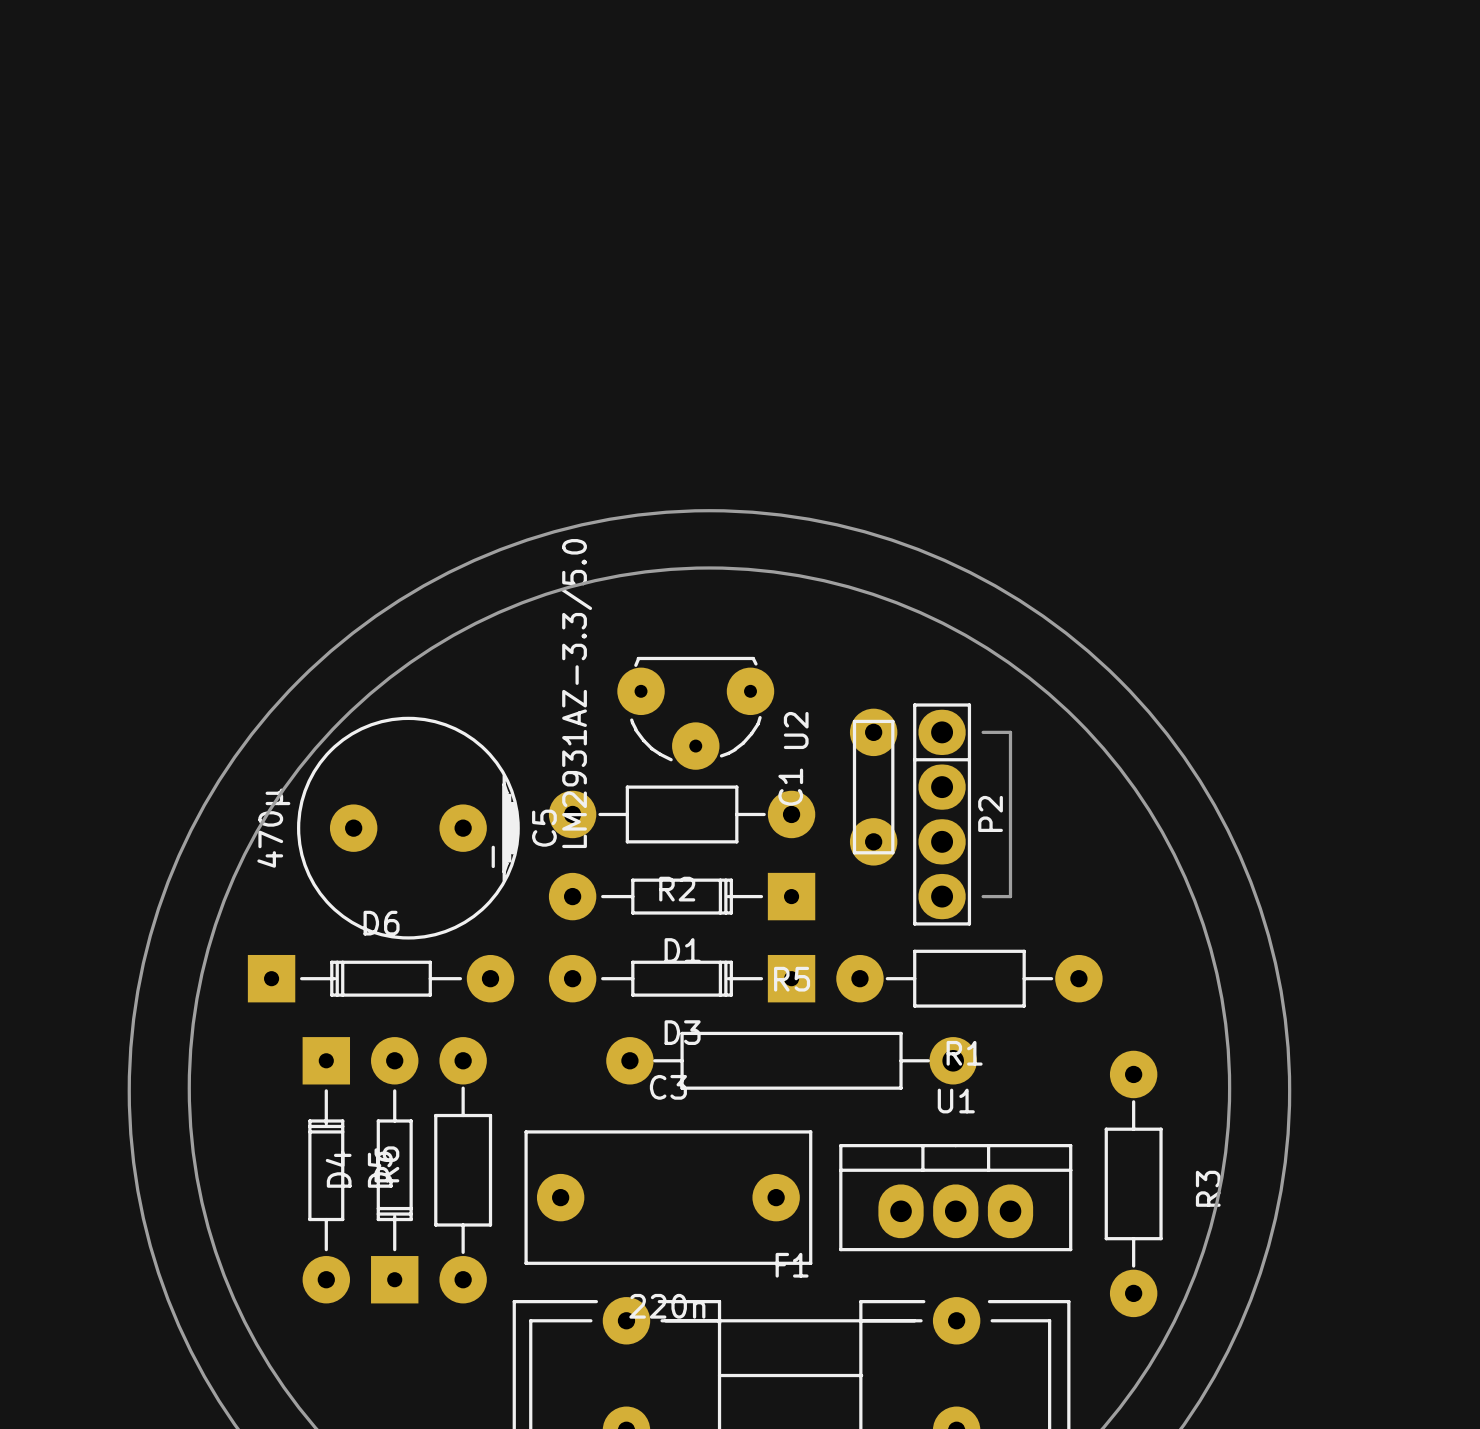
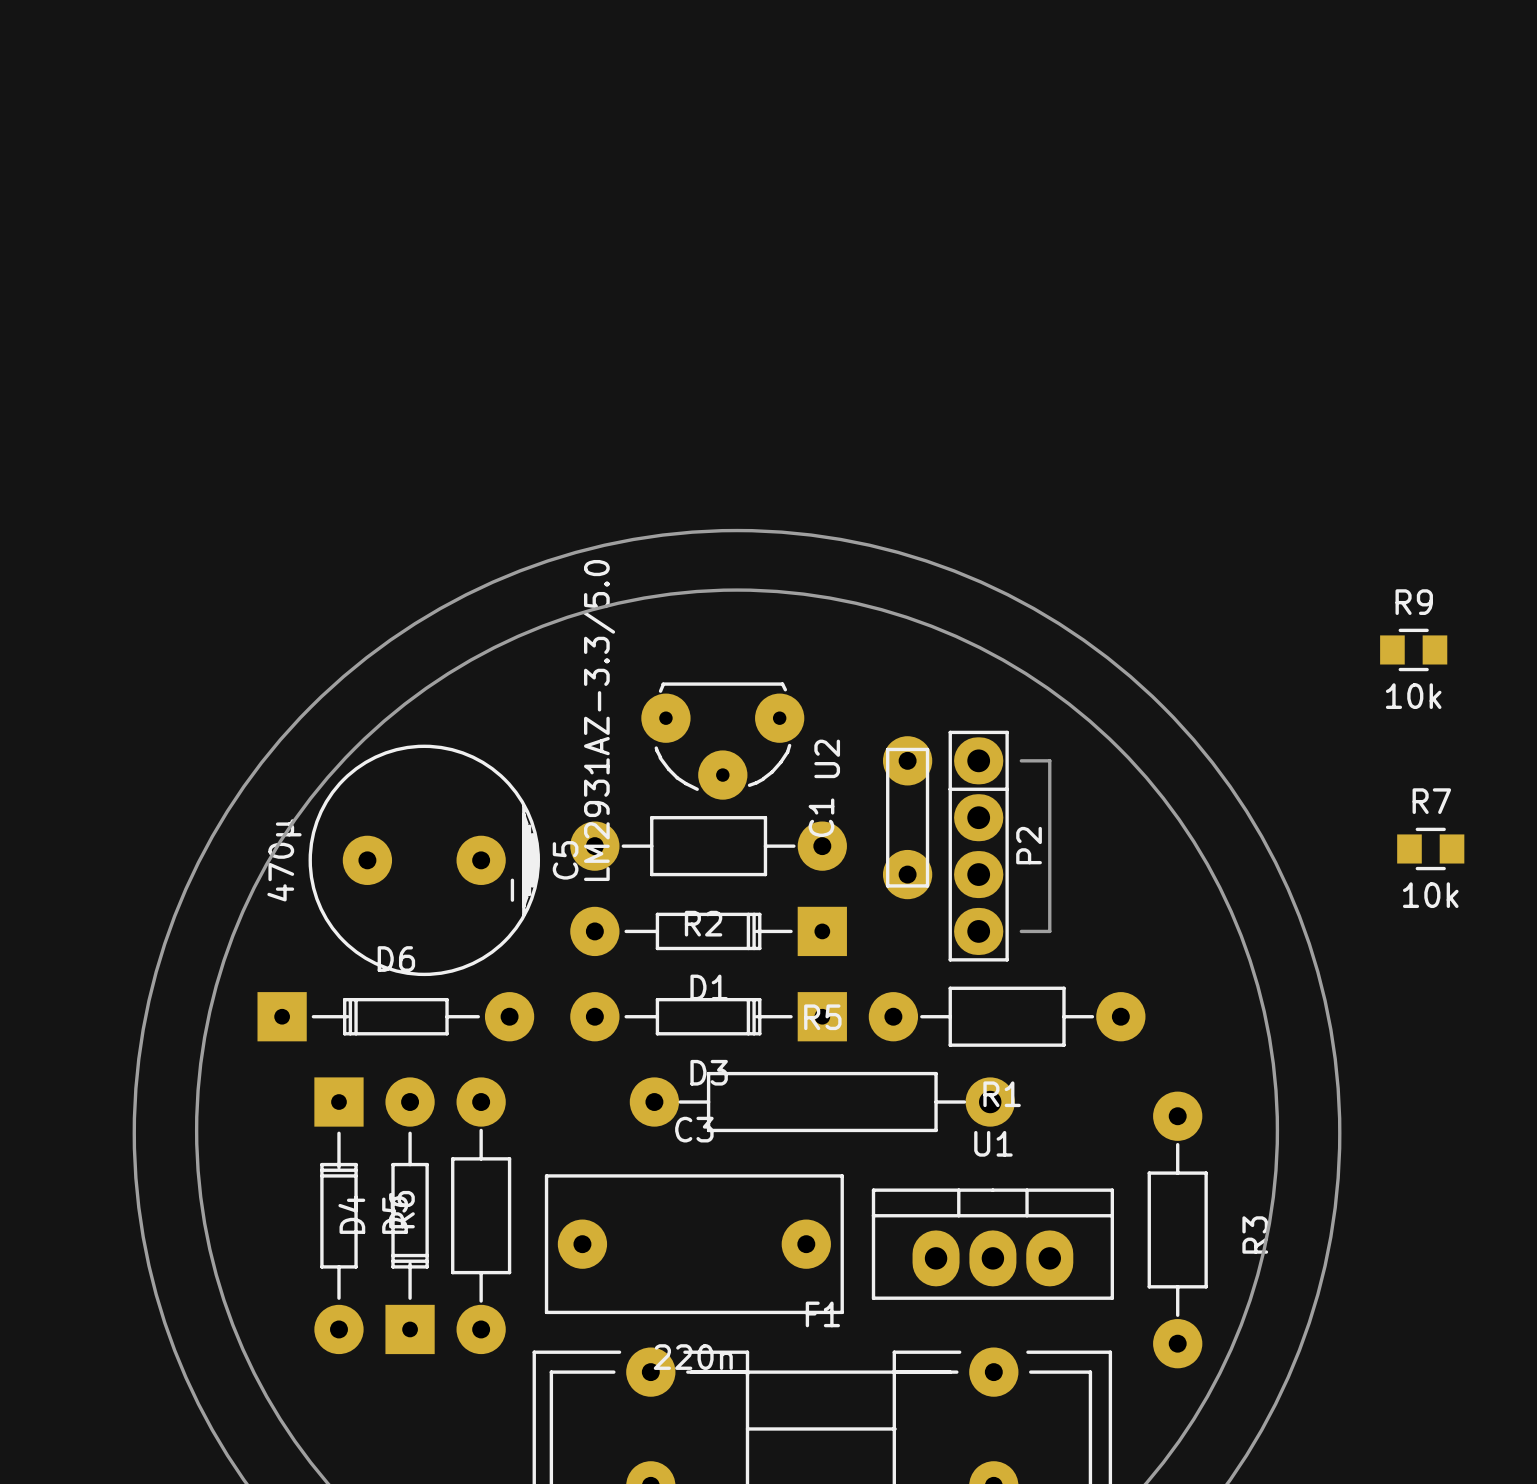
R9: none -> 10k (1413, 649)
R7: none -> 10k (1430, 848)

